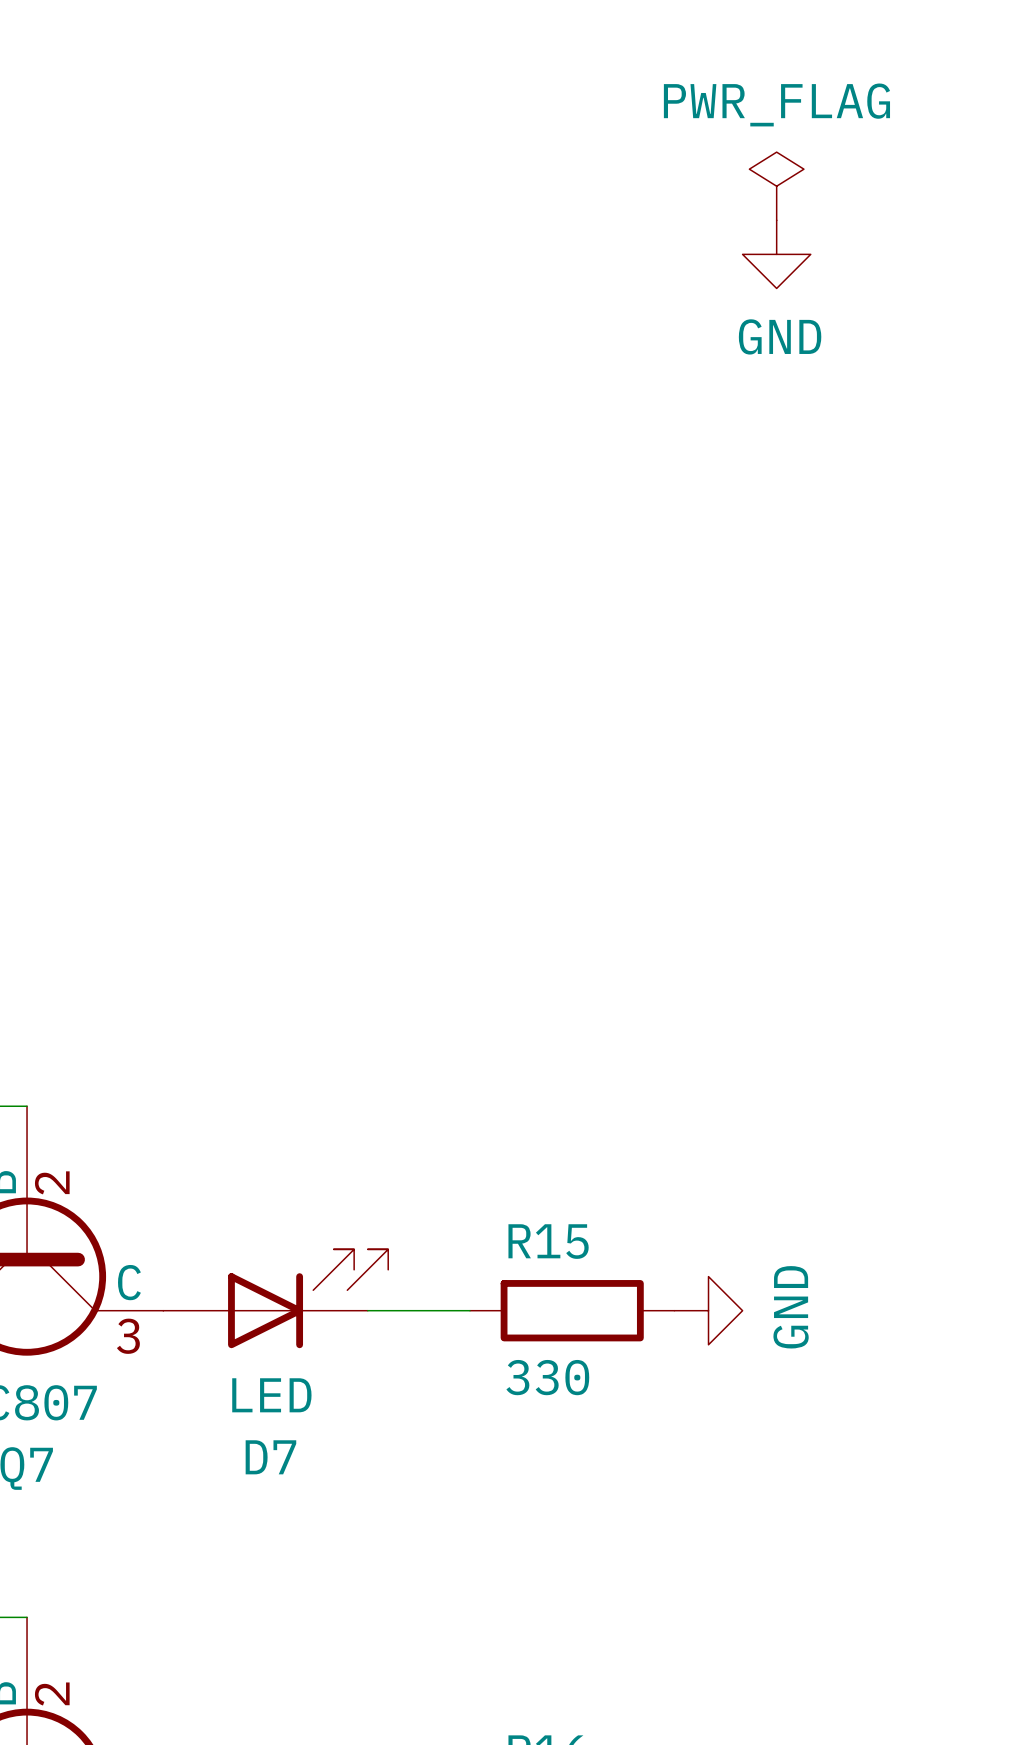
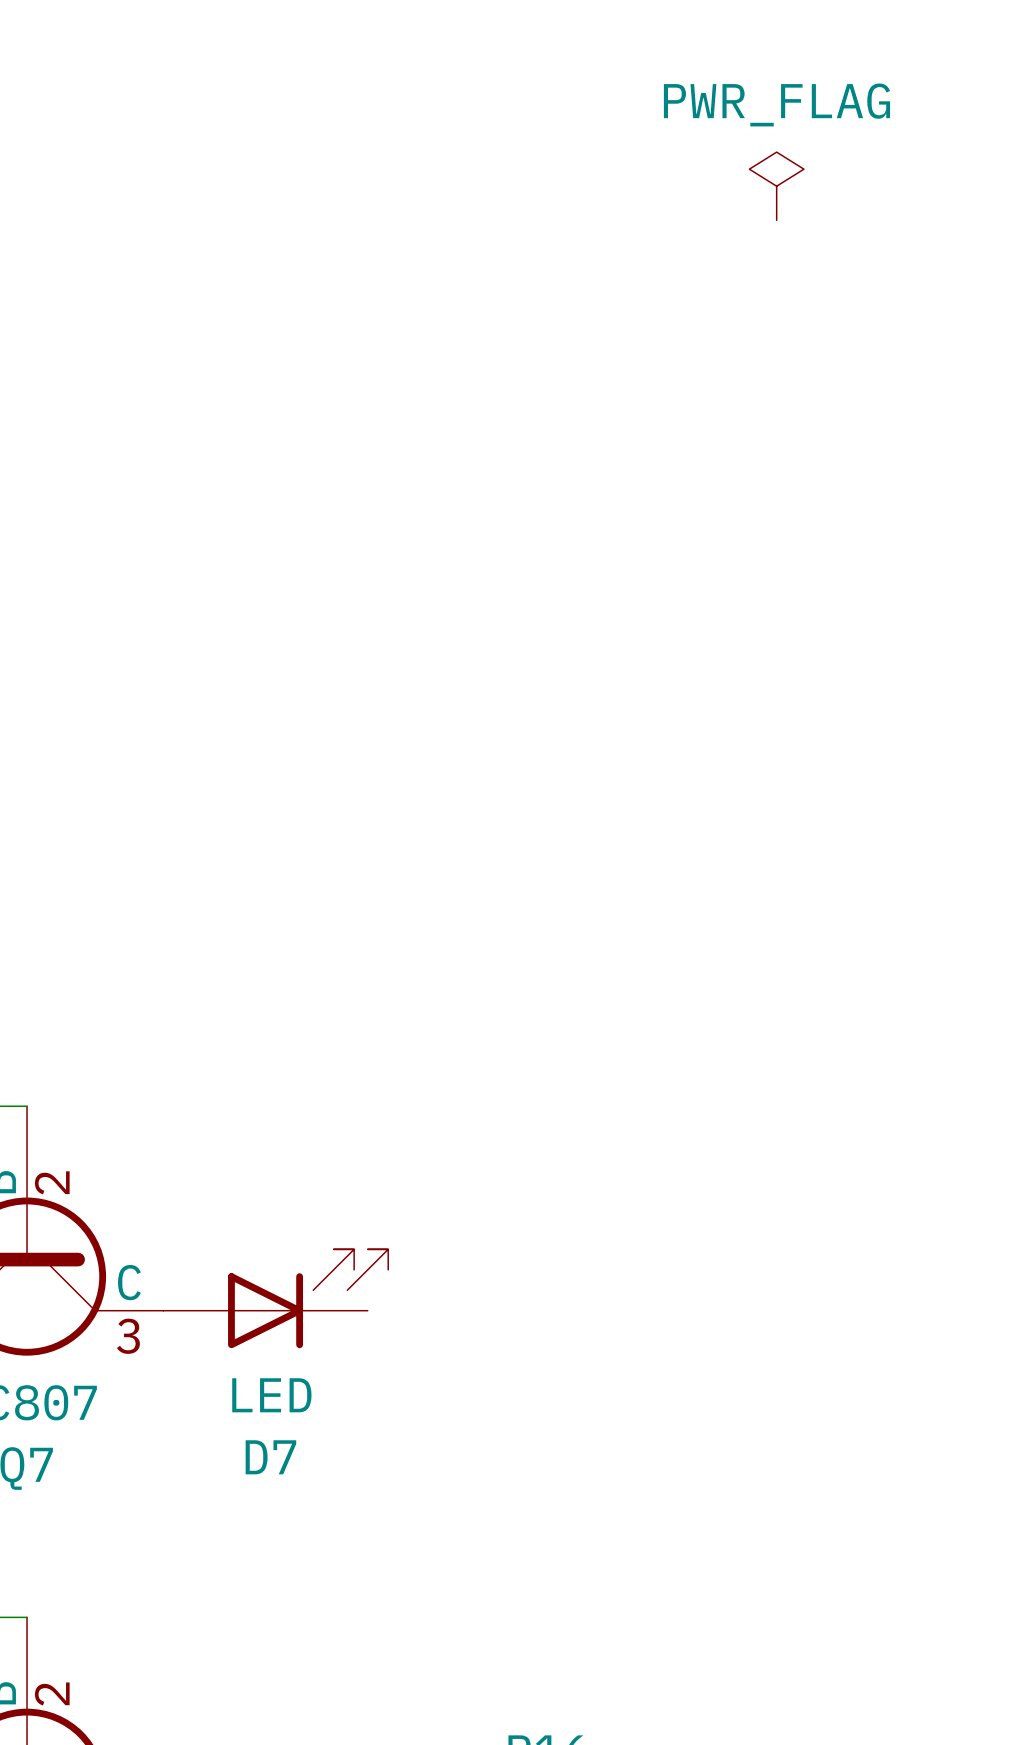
power symbol: GND (776, 254) -> none
wire: (367, 1310) (469, 1310) -> none
R15: 330 (572, 1310) -> none
power symbol: GND (708, 1310) -> none

